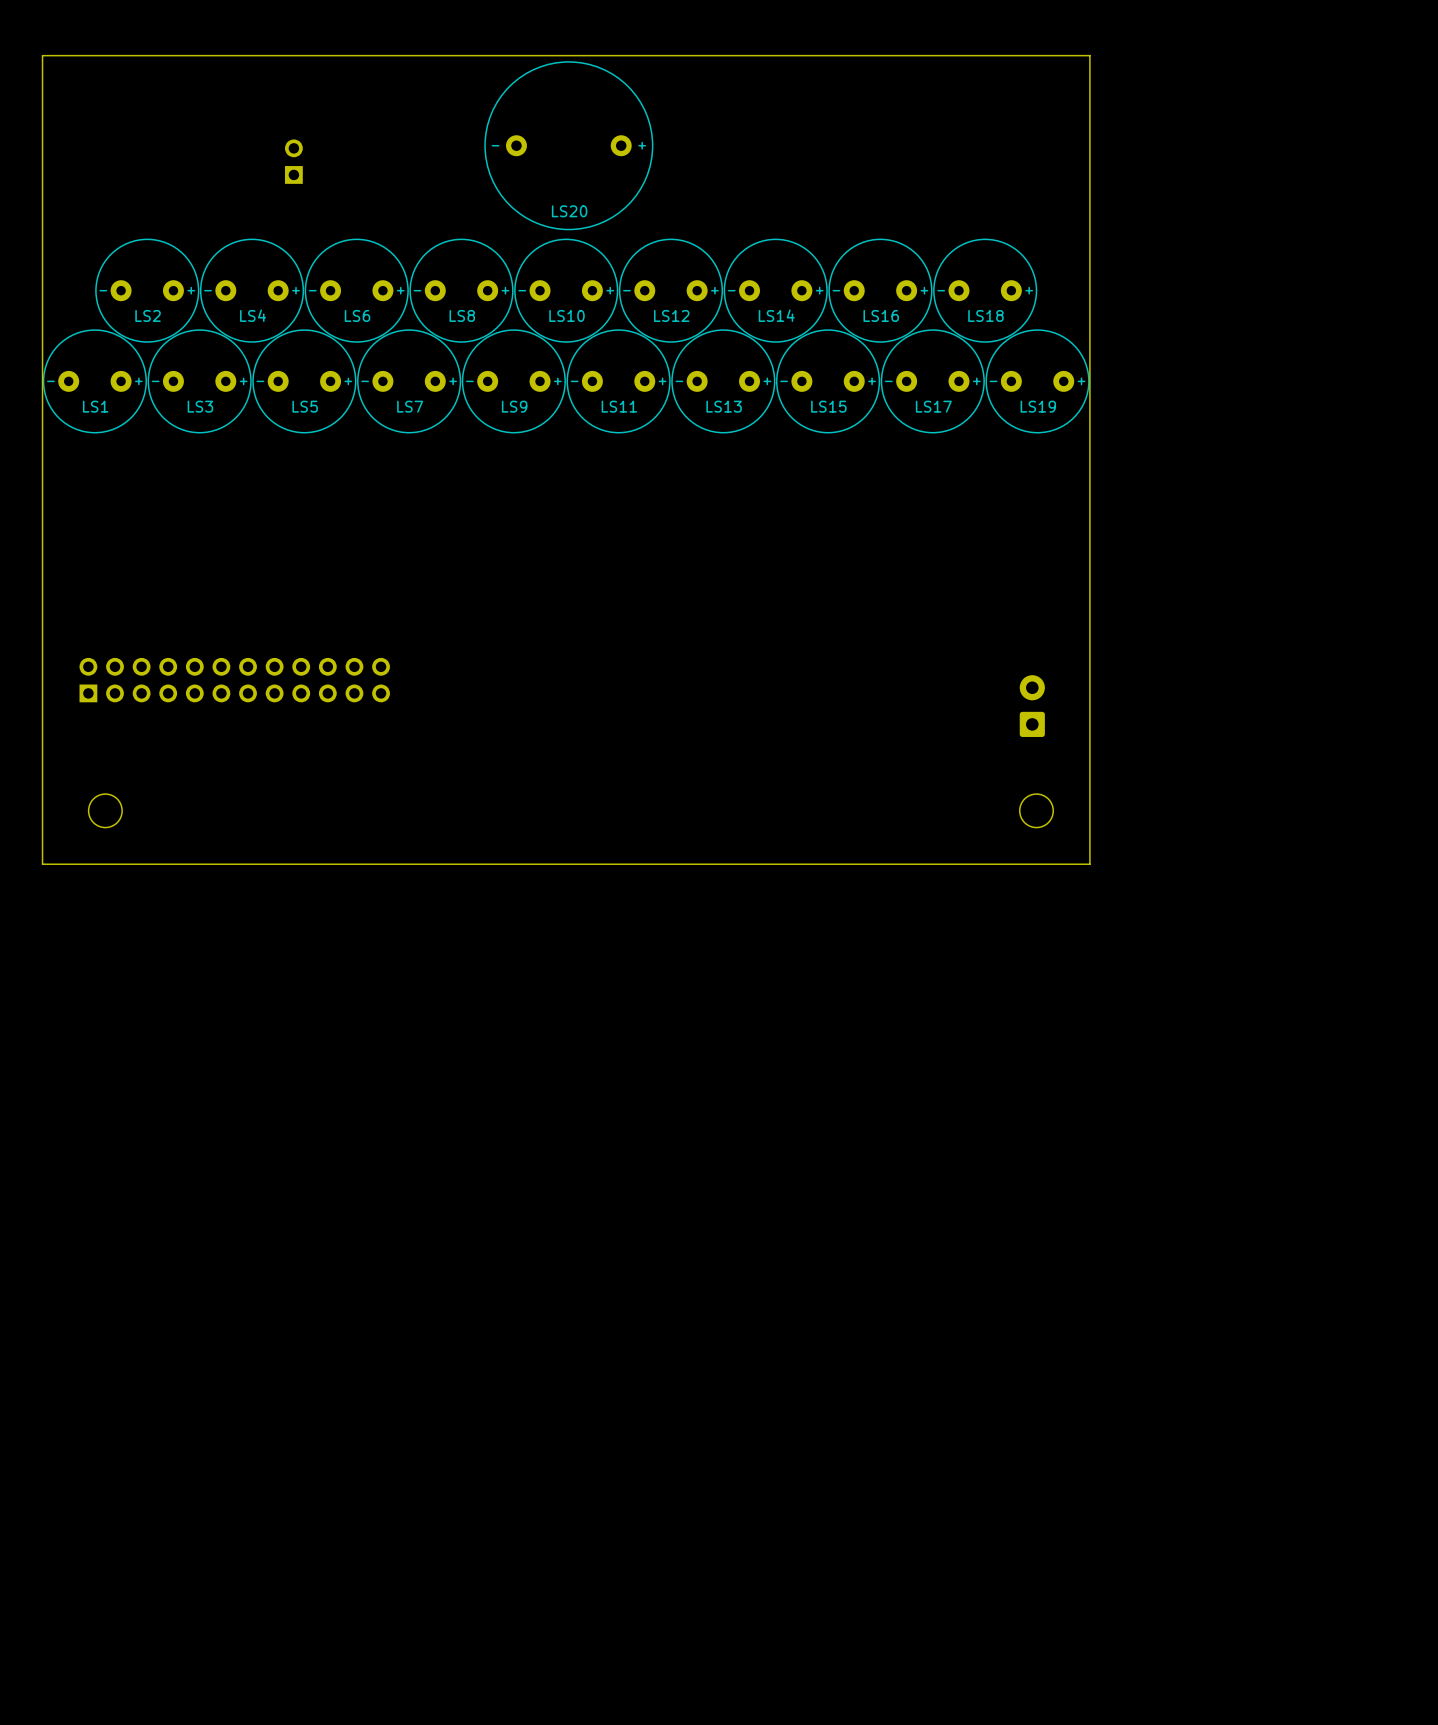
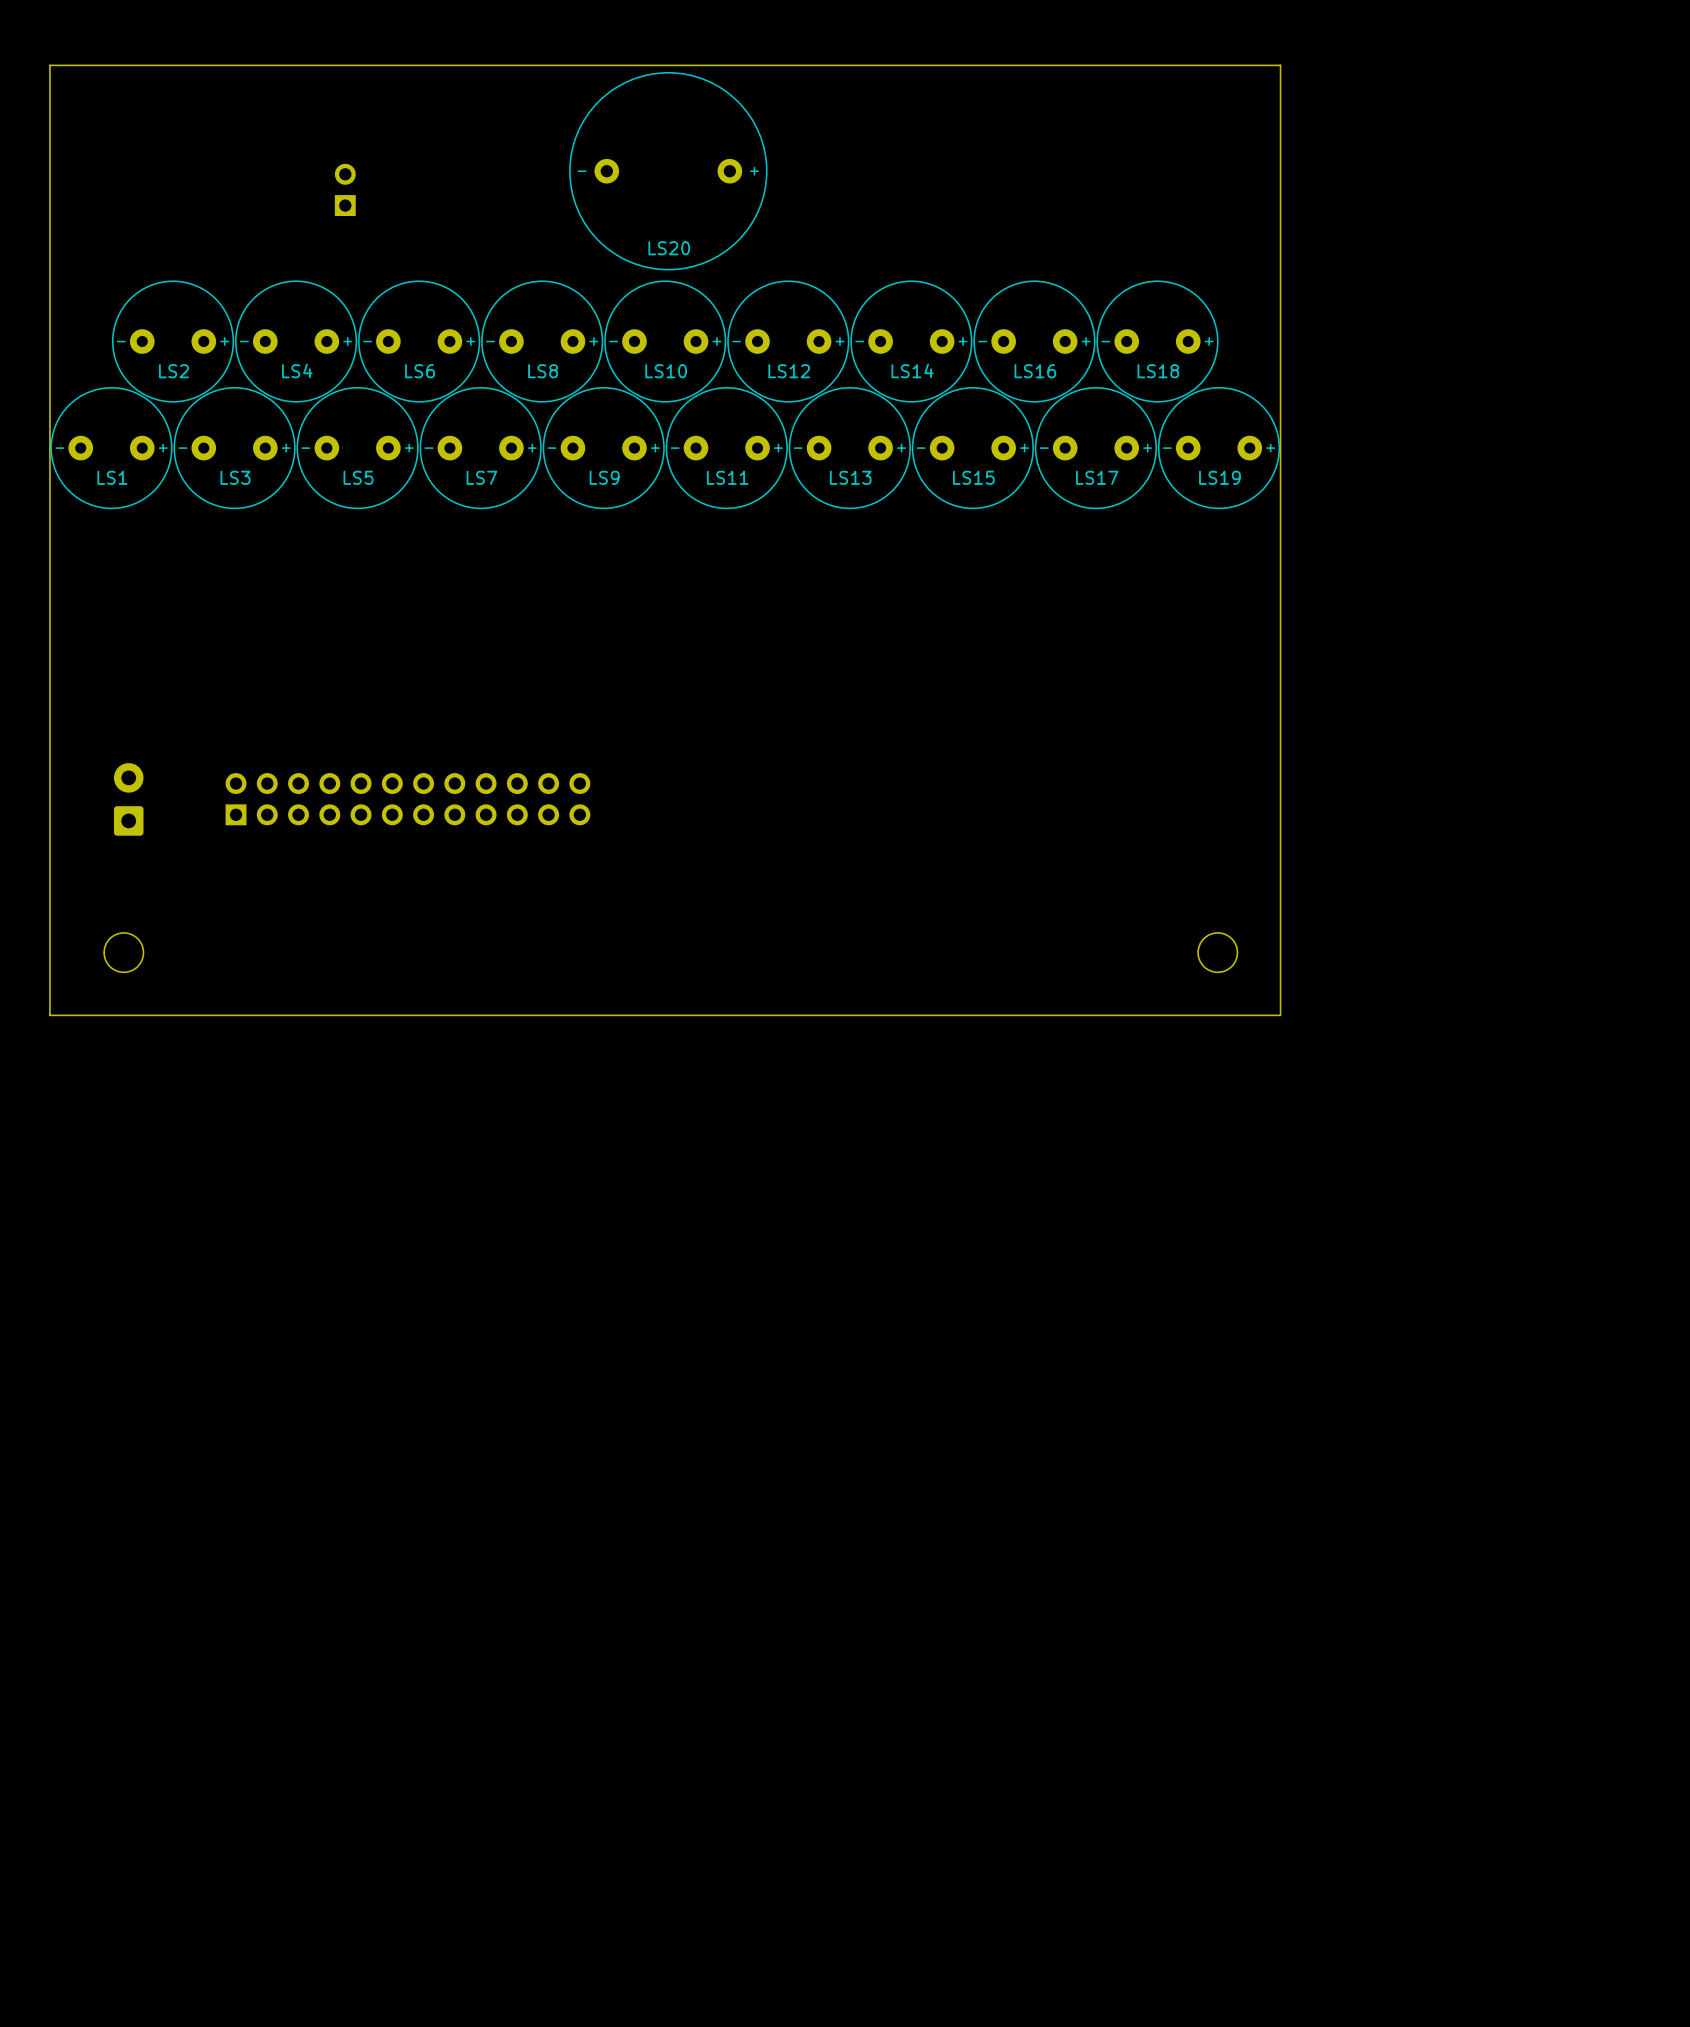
part: none -> (128, 799)
part position: (234, 680) -> (407, 799)
part: (1032, 706) -> none

